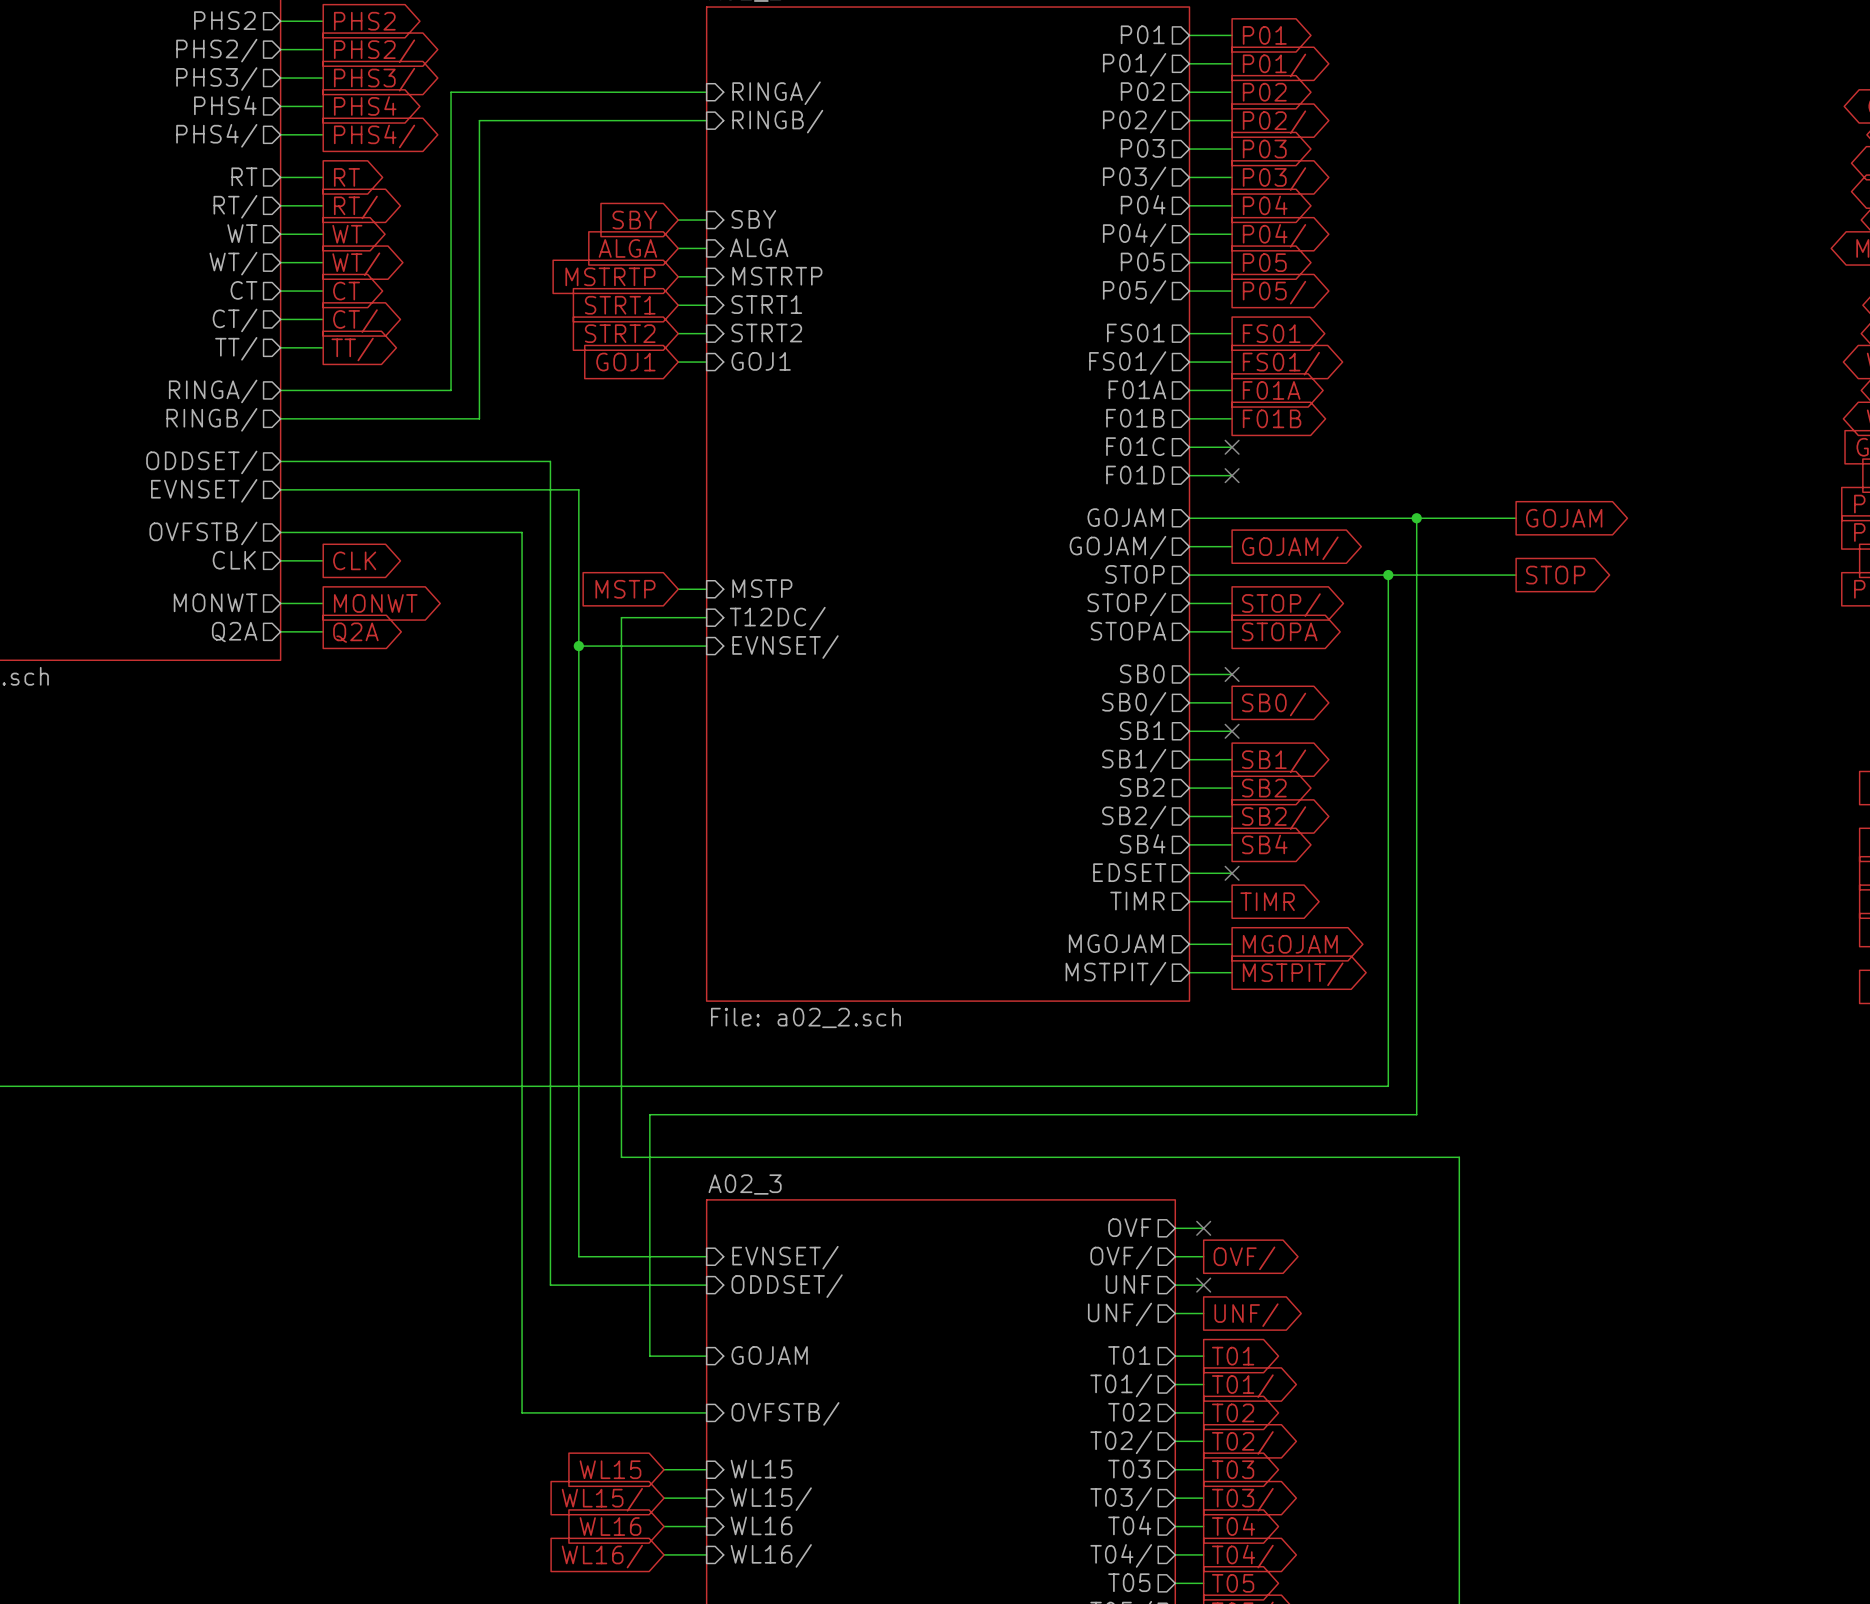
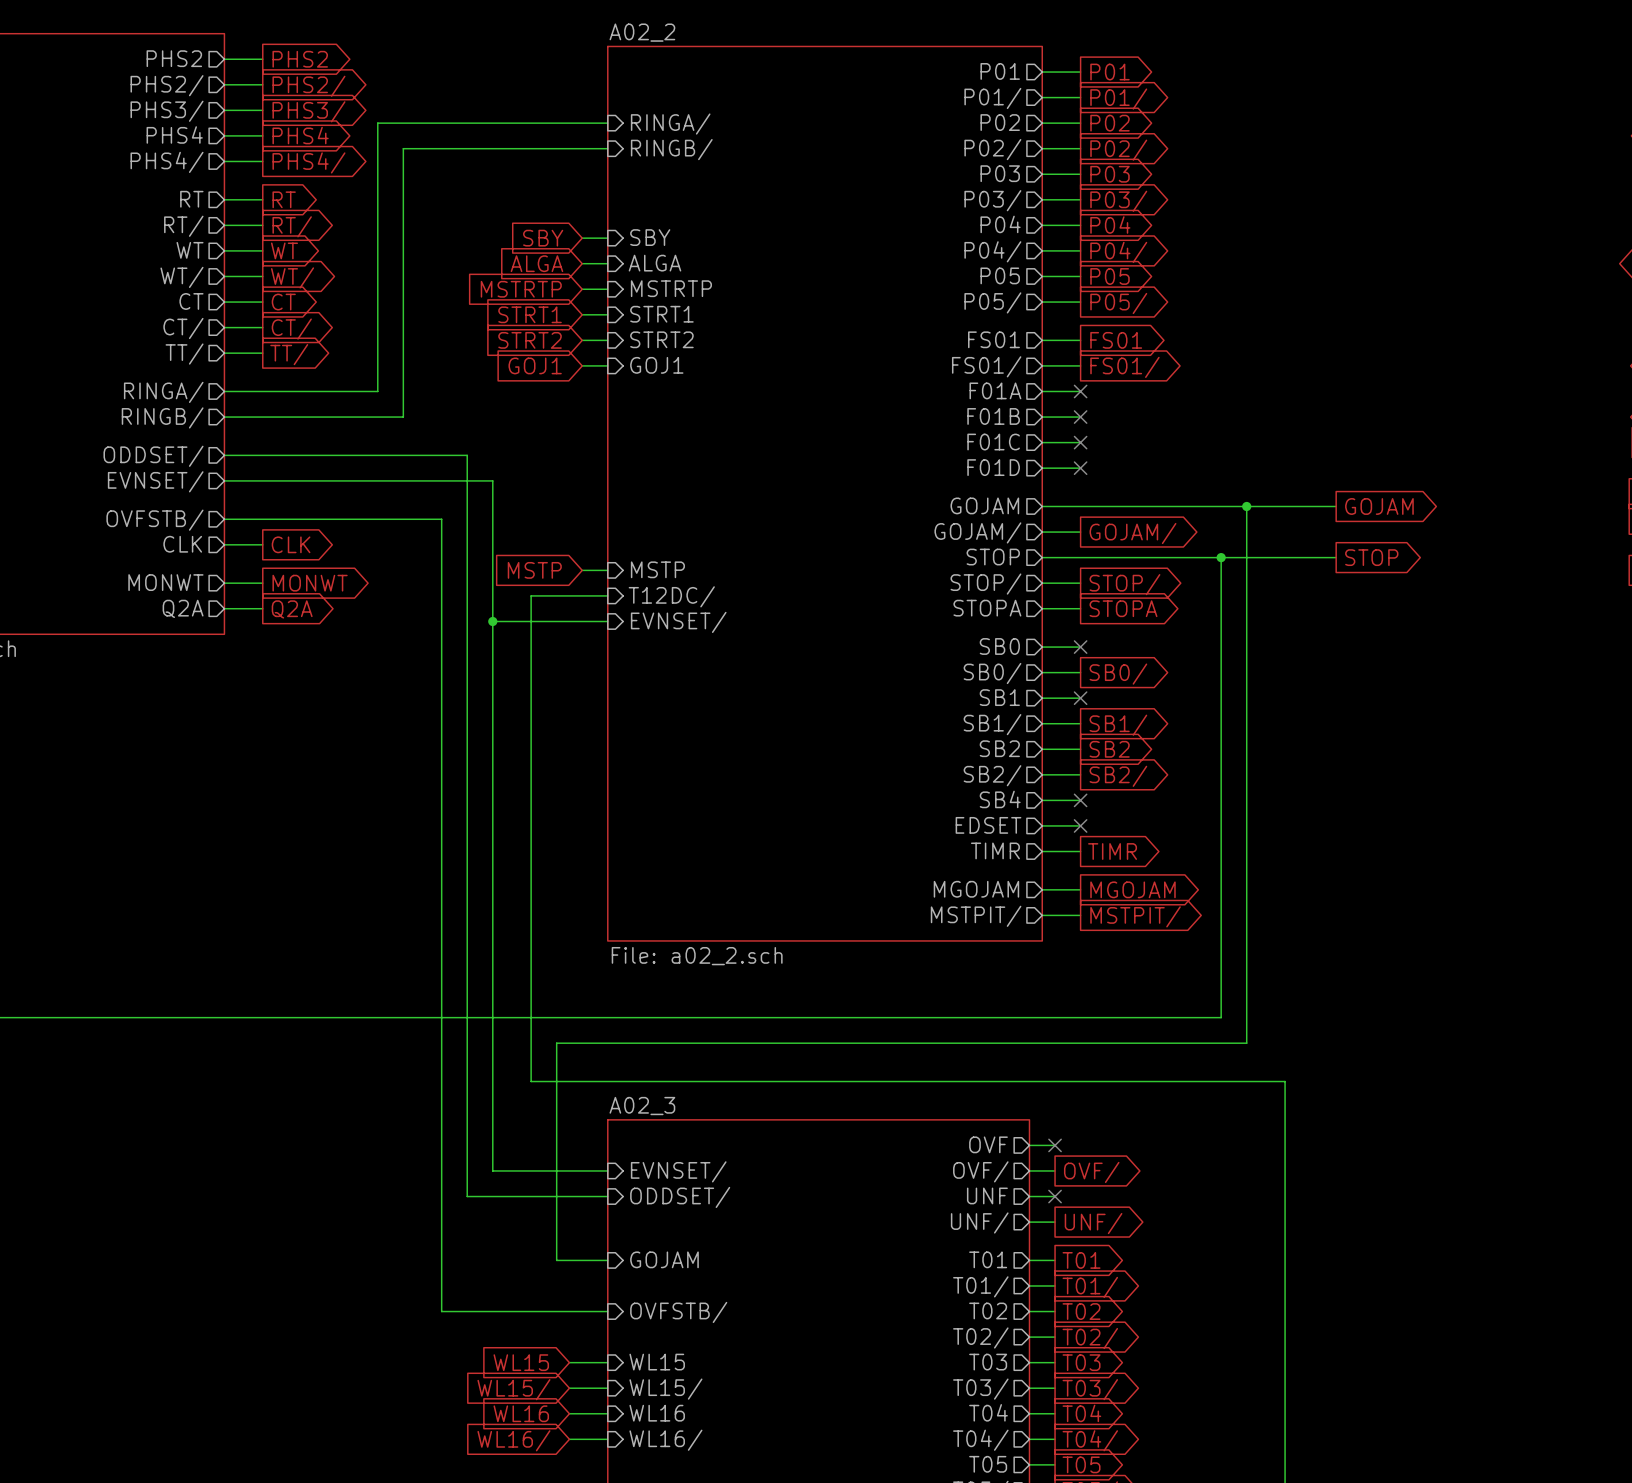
no-connect mark: none -> (1080, 391)
global label: F01A (1271, 390) -> none
no-connect mark: none -> (1080, 417)
global label: F01B (1272, 418) -> none
no-connect mark: none -> (1080, 800)
global label: SB4 (1264, 844) -> none

